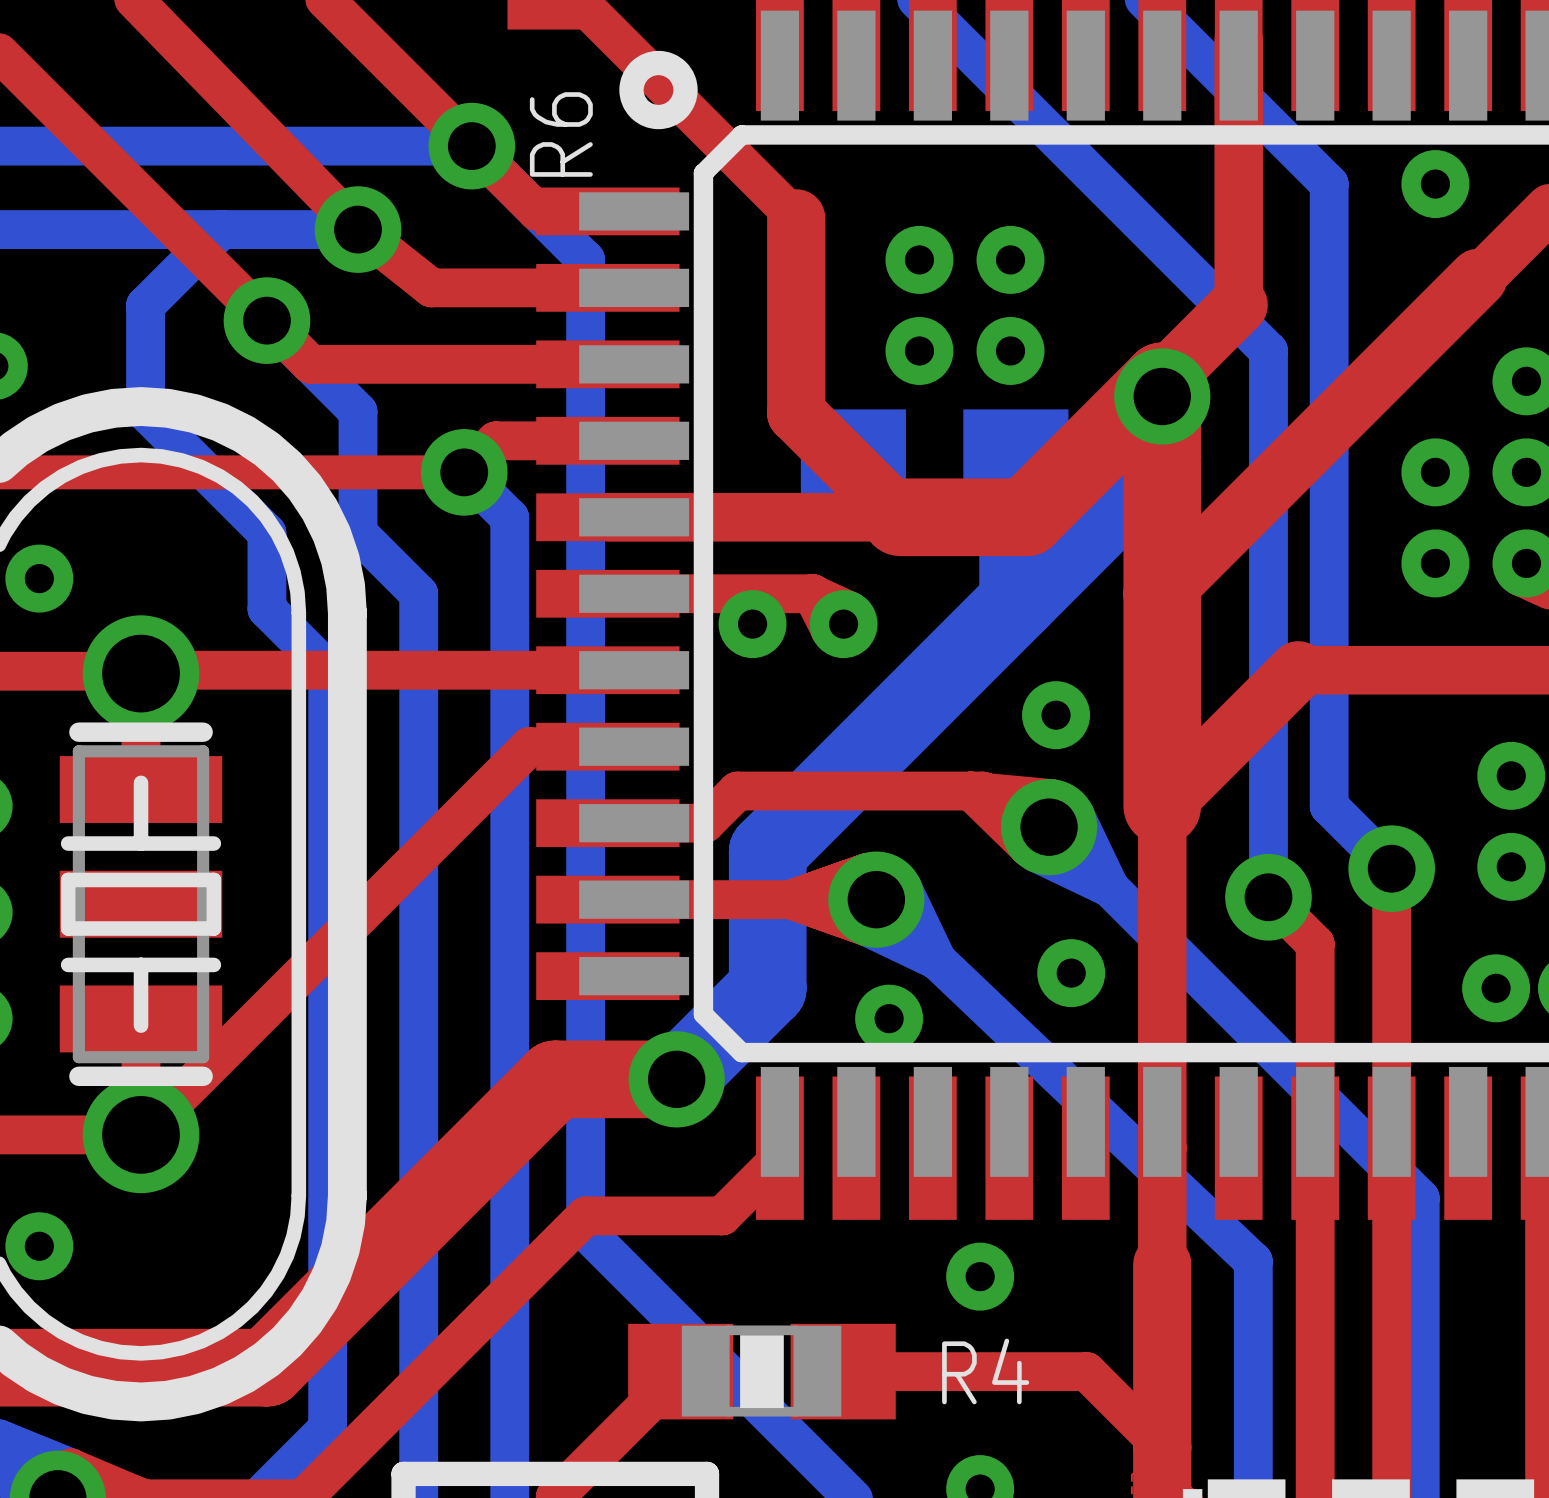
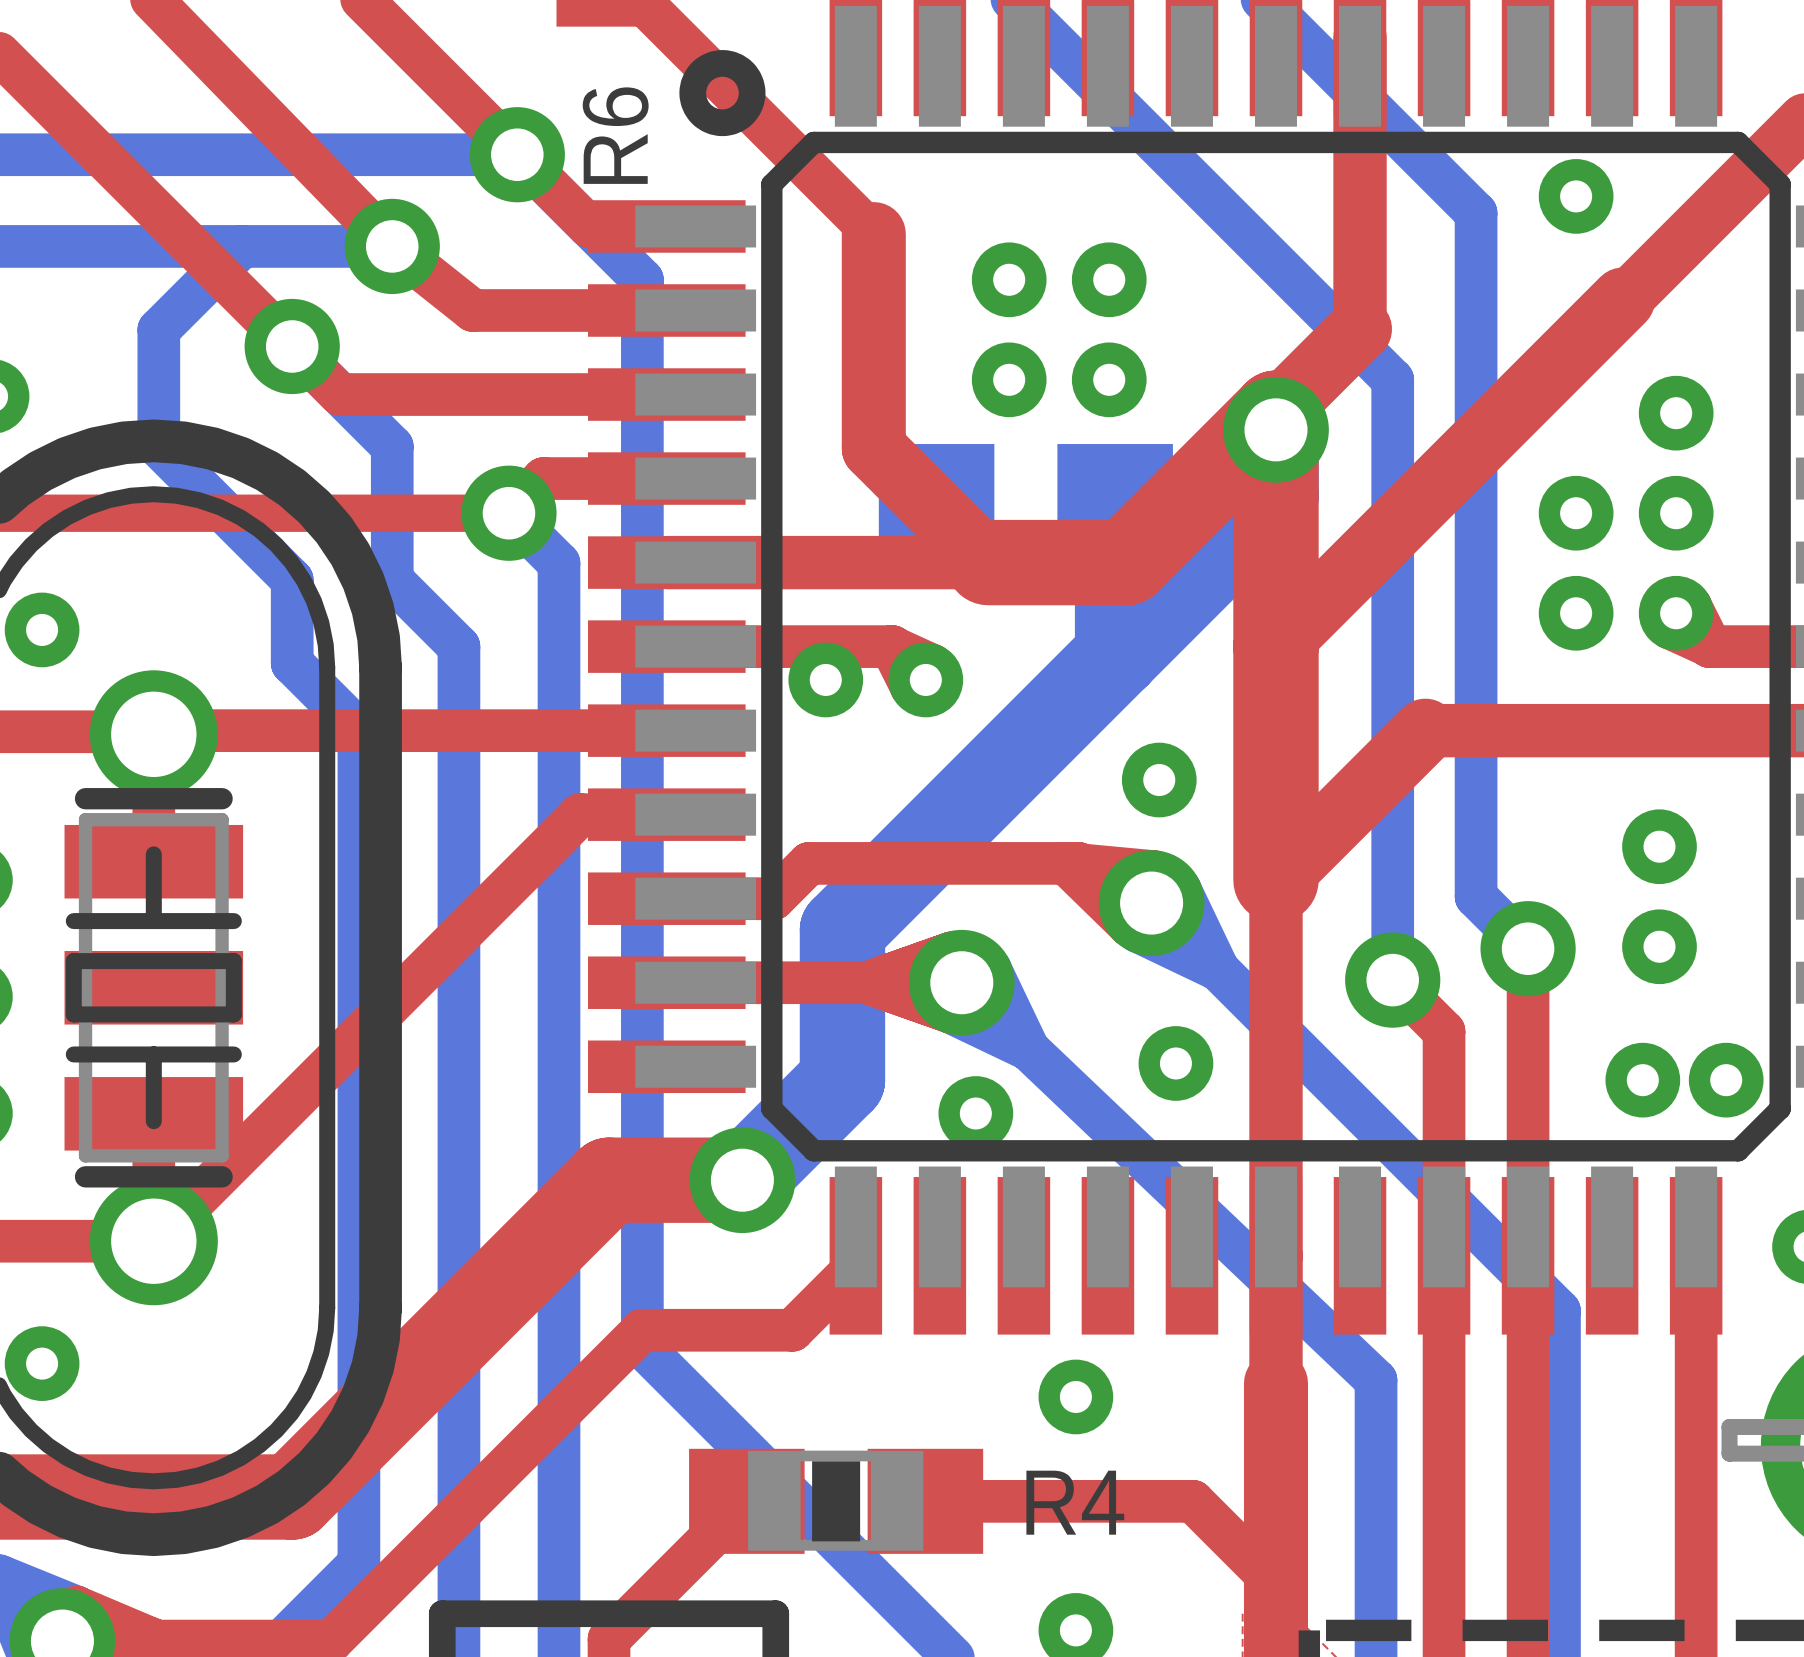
bottom track: (1329, 184) (1329, 806) (1344, 821) -> (1459, 196) (1476, 213) (1476, 896)

